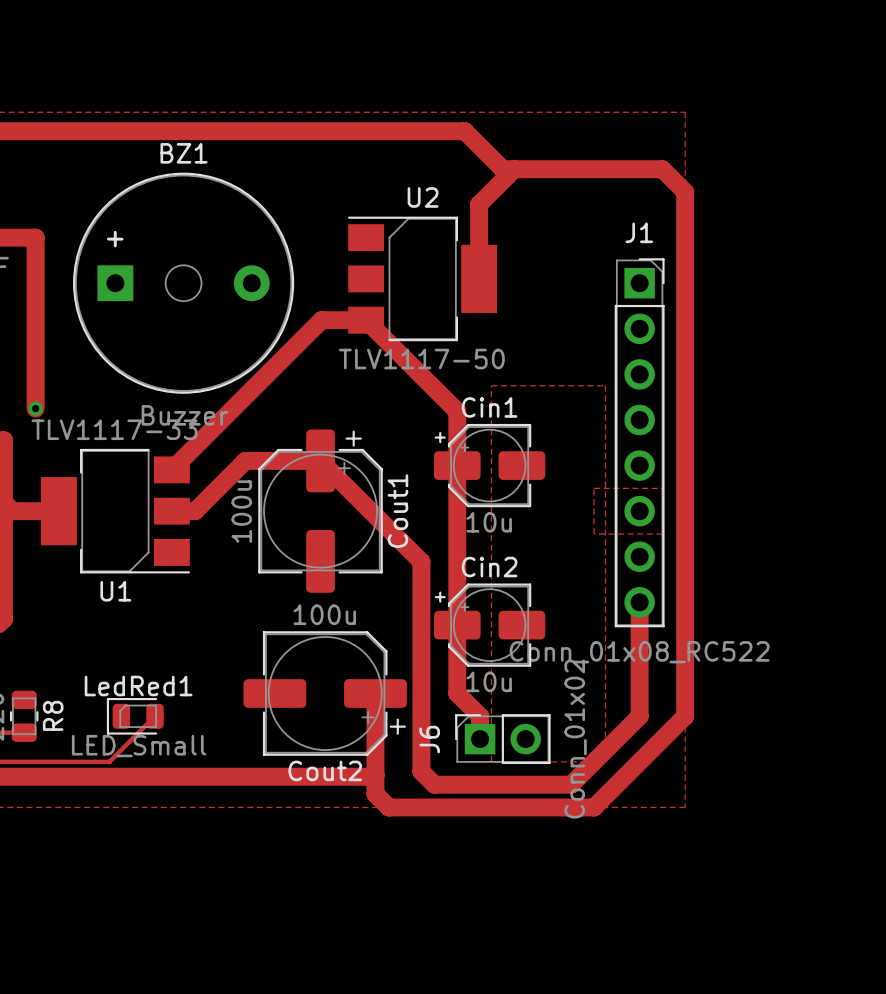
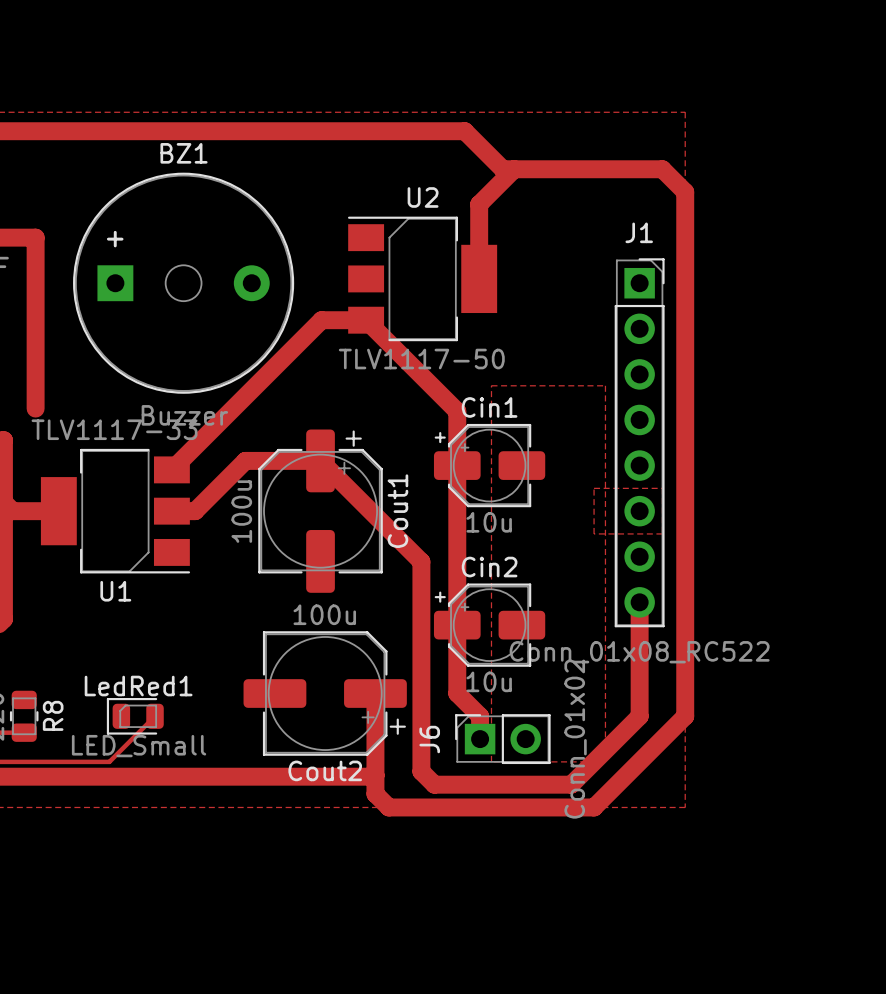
via: (35, 408) -> none

